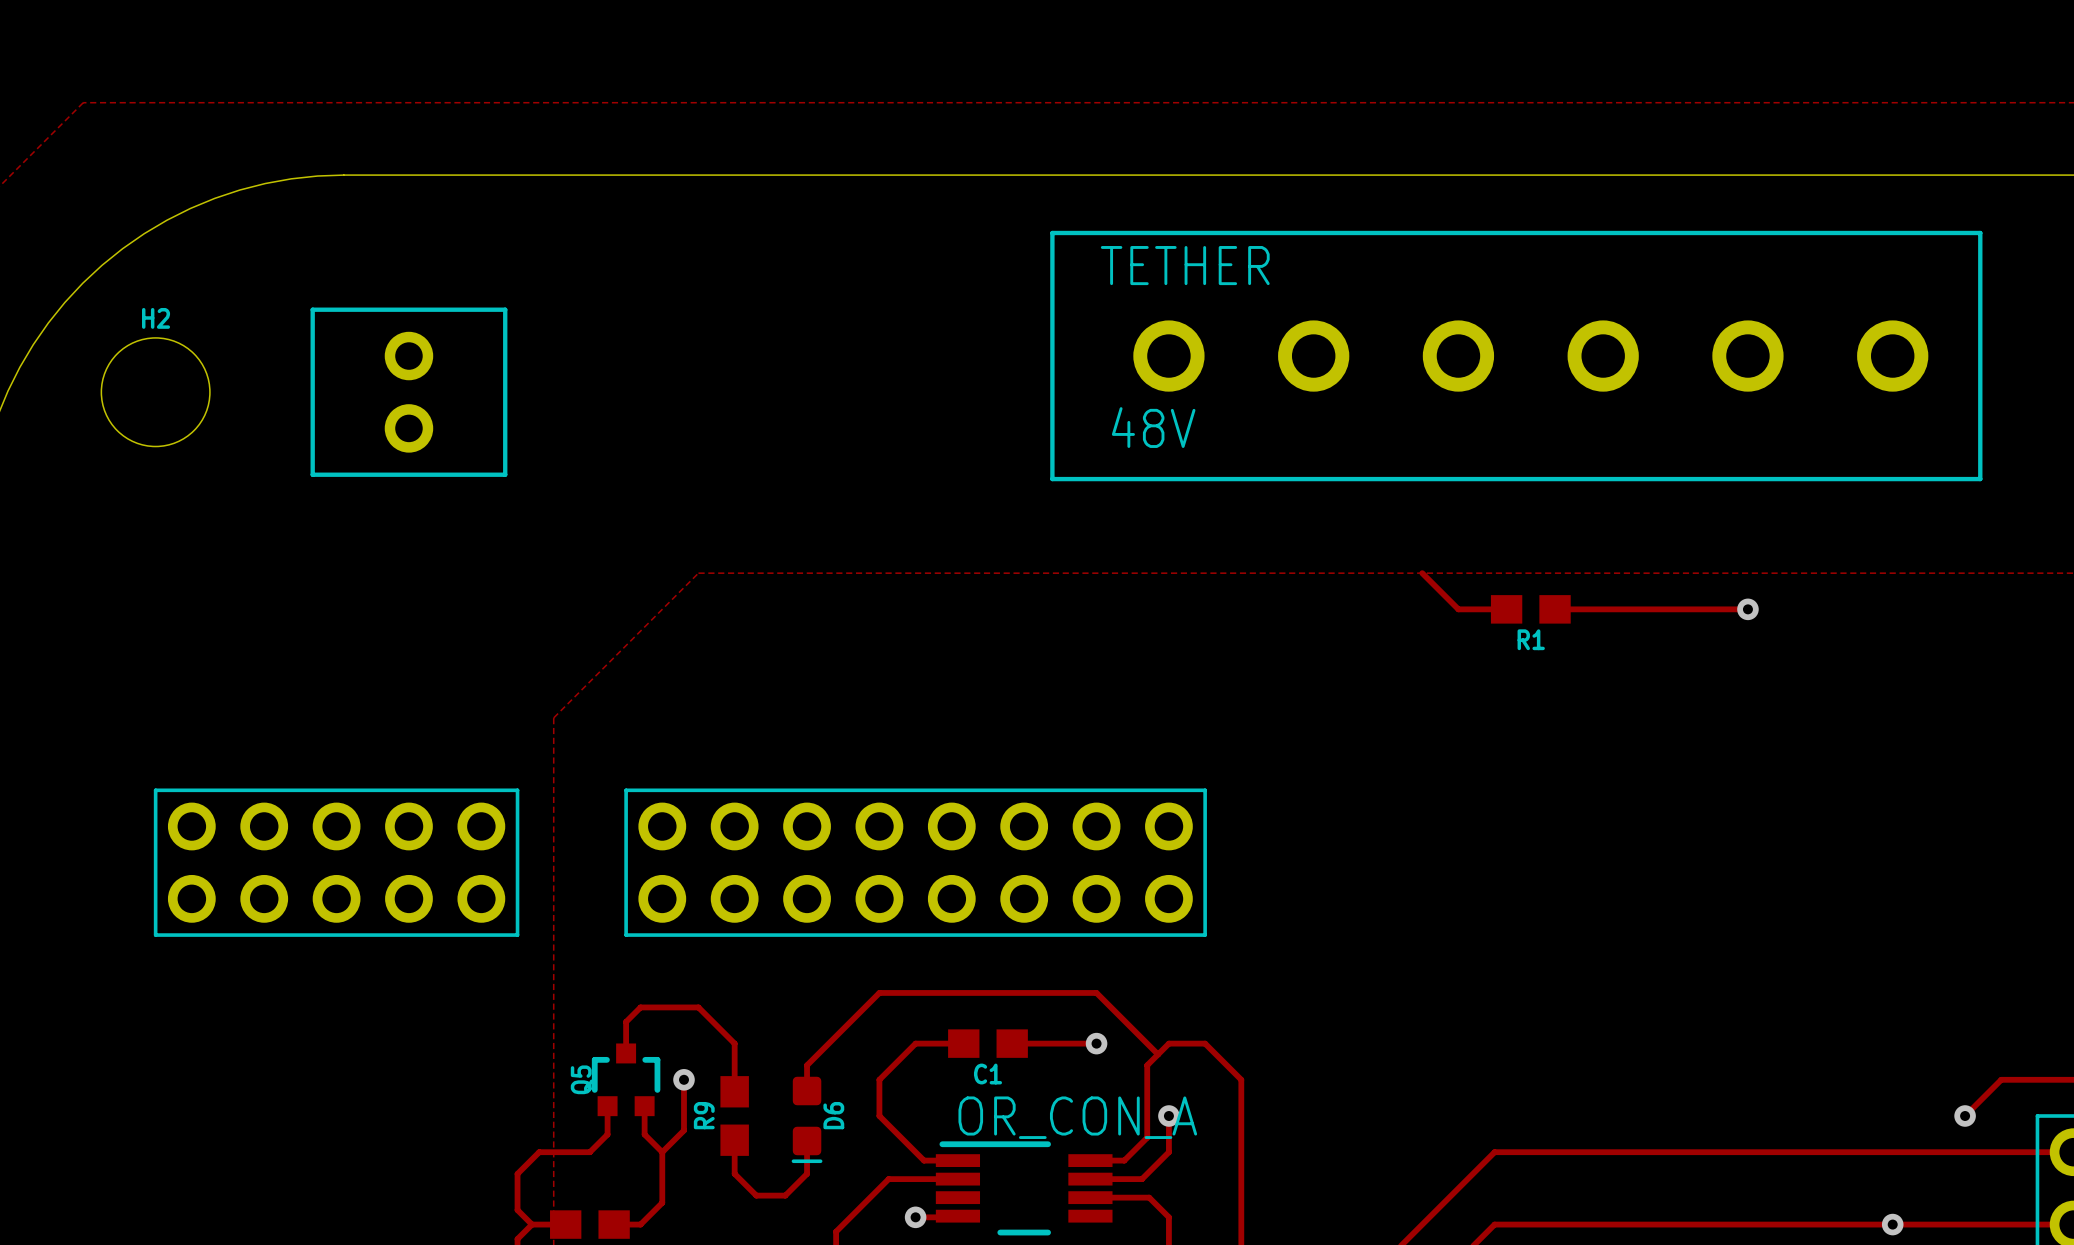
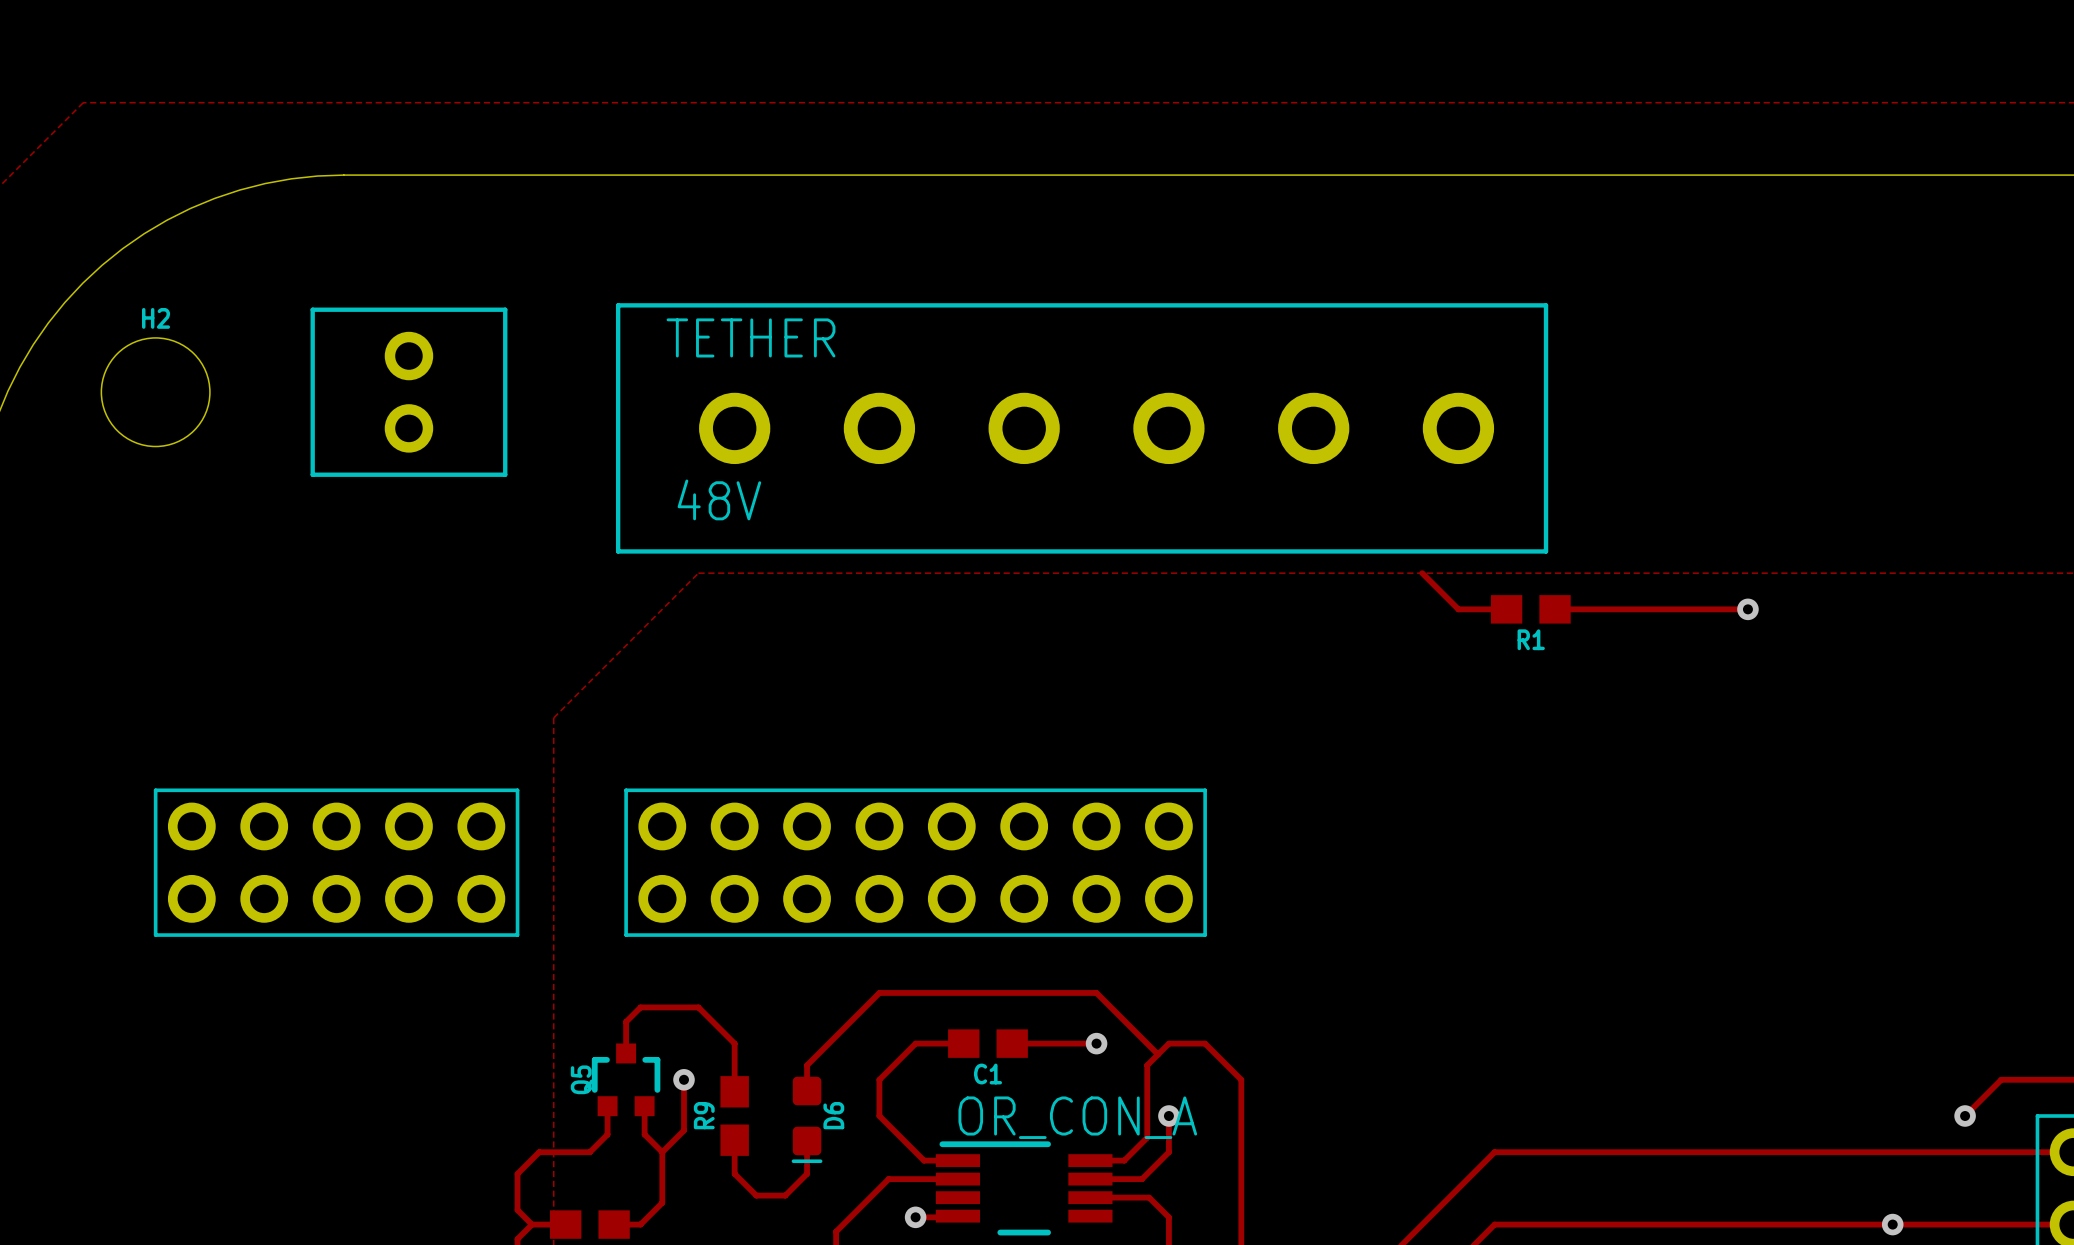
TETHER position: (1516, 356) -> (1082, 428)

